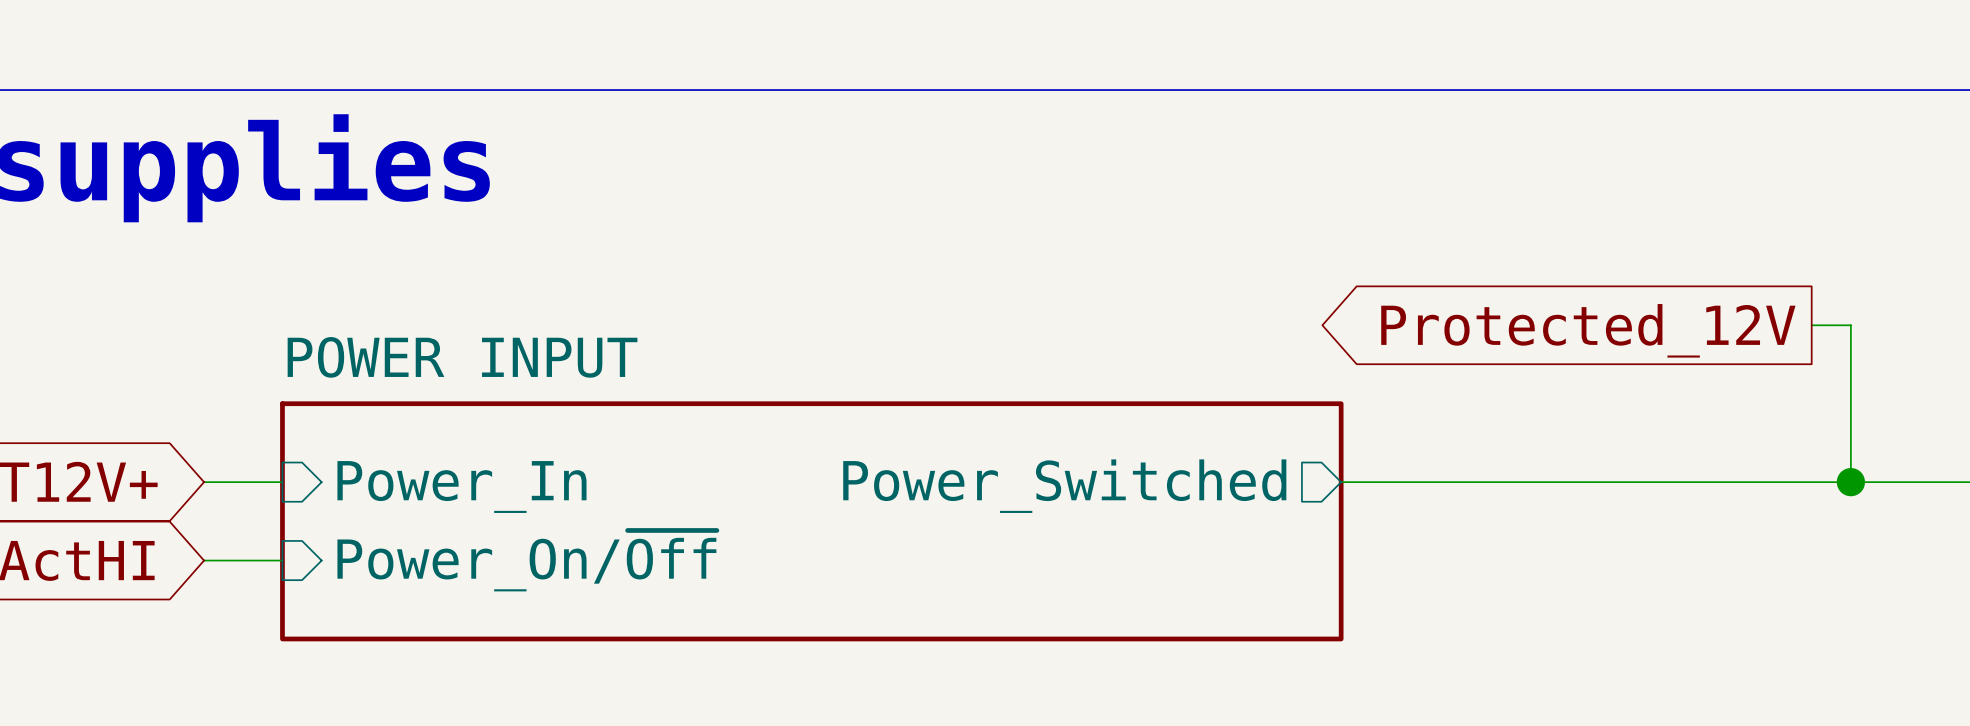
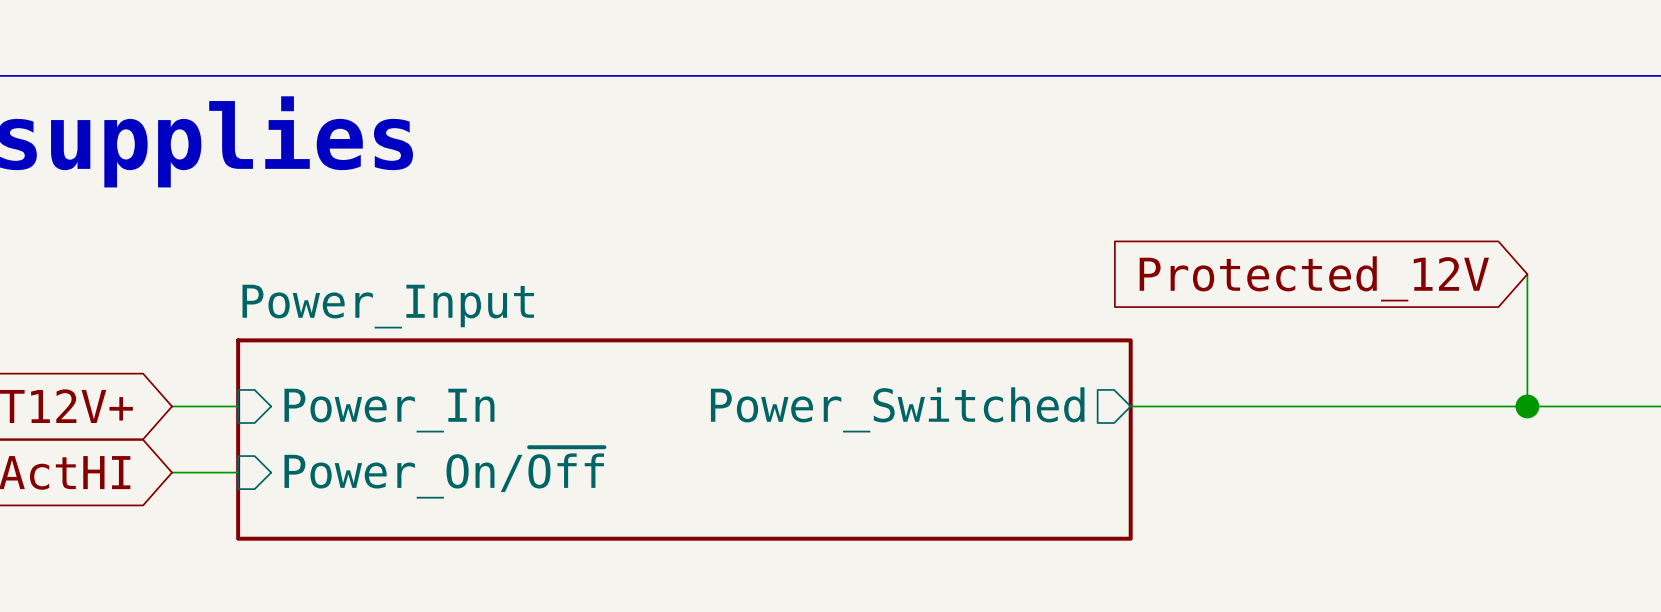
wire: (1811, 325) (1850, 325) (1850, 482) -> (1527, 274) (1527, 406)
global label shape: output (1588, 330) -> input (1314, 278)
sheet POWER INPUT name: POWER INPUT (462, 357) -> Power_Input (388, 306)
junction position: (1850, 482) -> (1527, 406)

